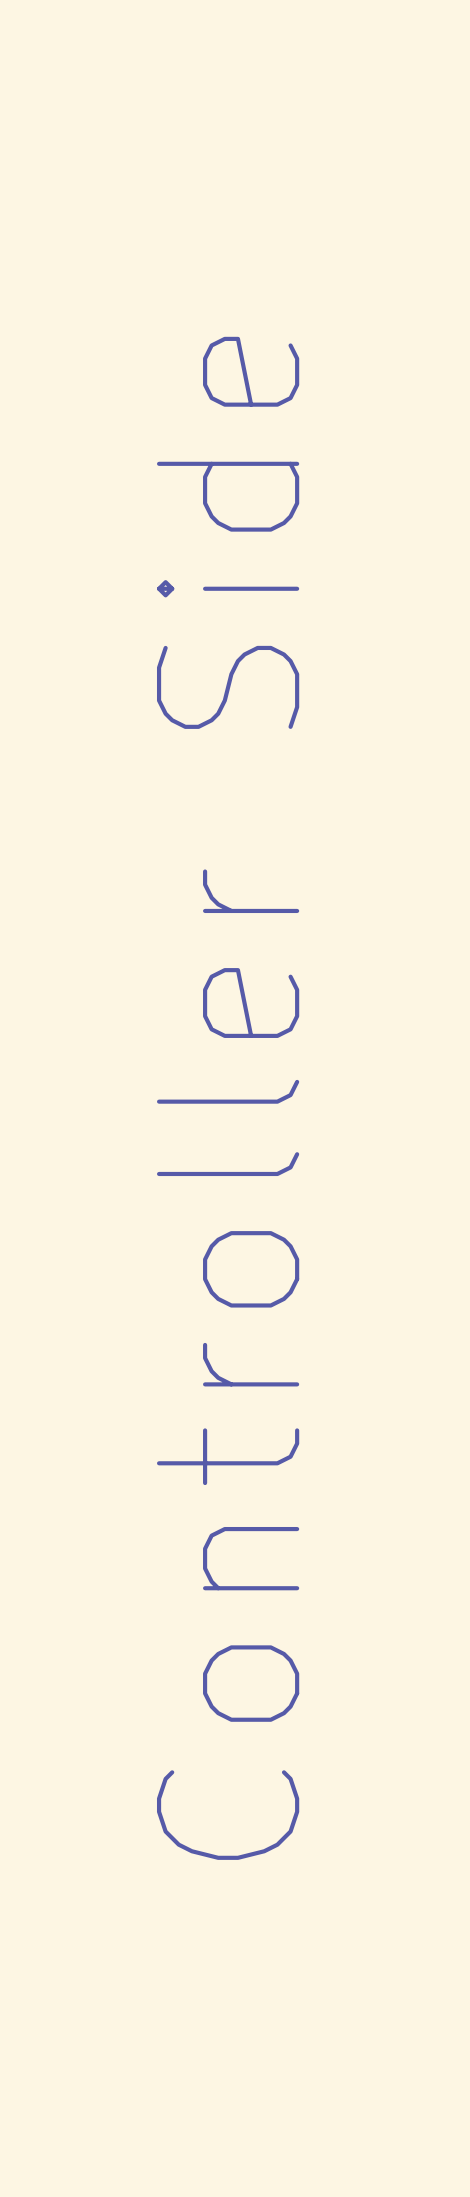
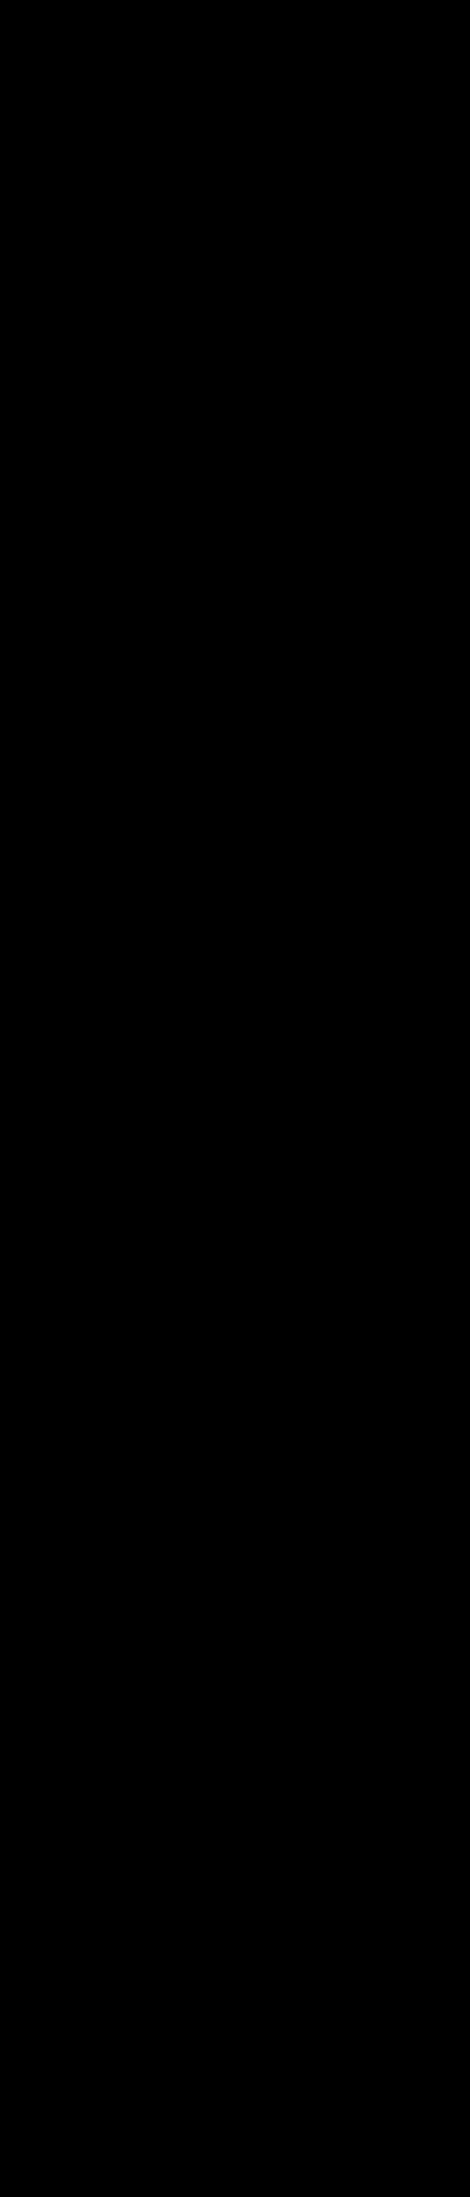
text: Controller Side (228, 1098) -> none

